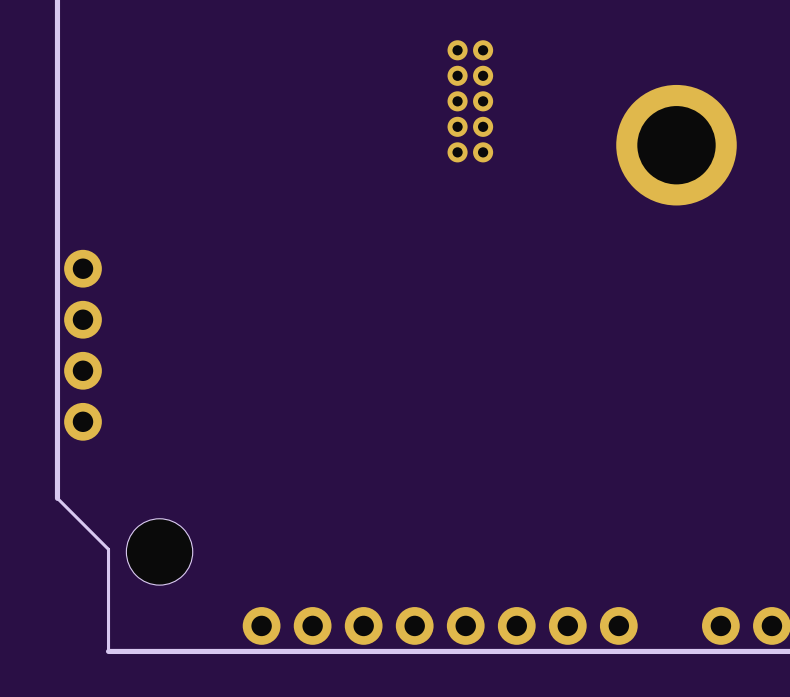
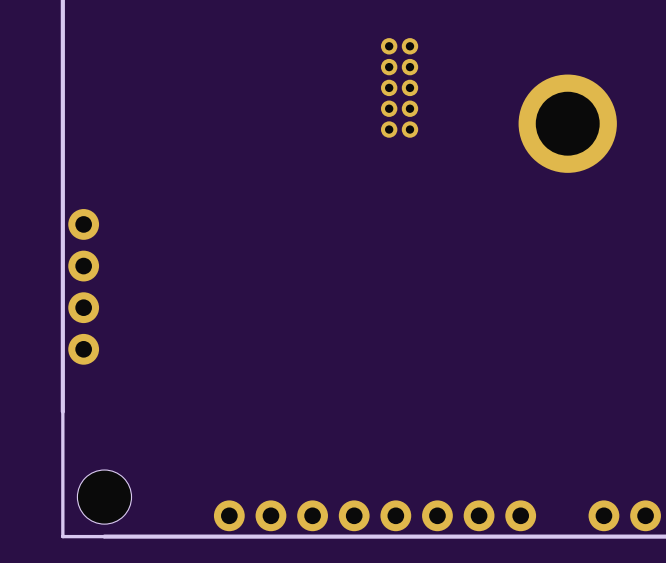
board edge: (57, 498) (108, 549) (108, 651) -> (62, 411) (62, 536) (104, 536)
part position: (159, 551) -> (104, 497)

